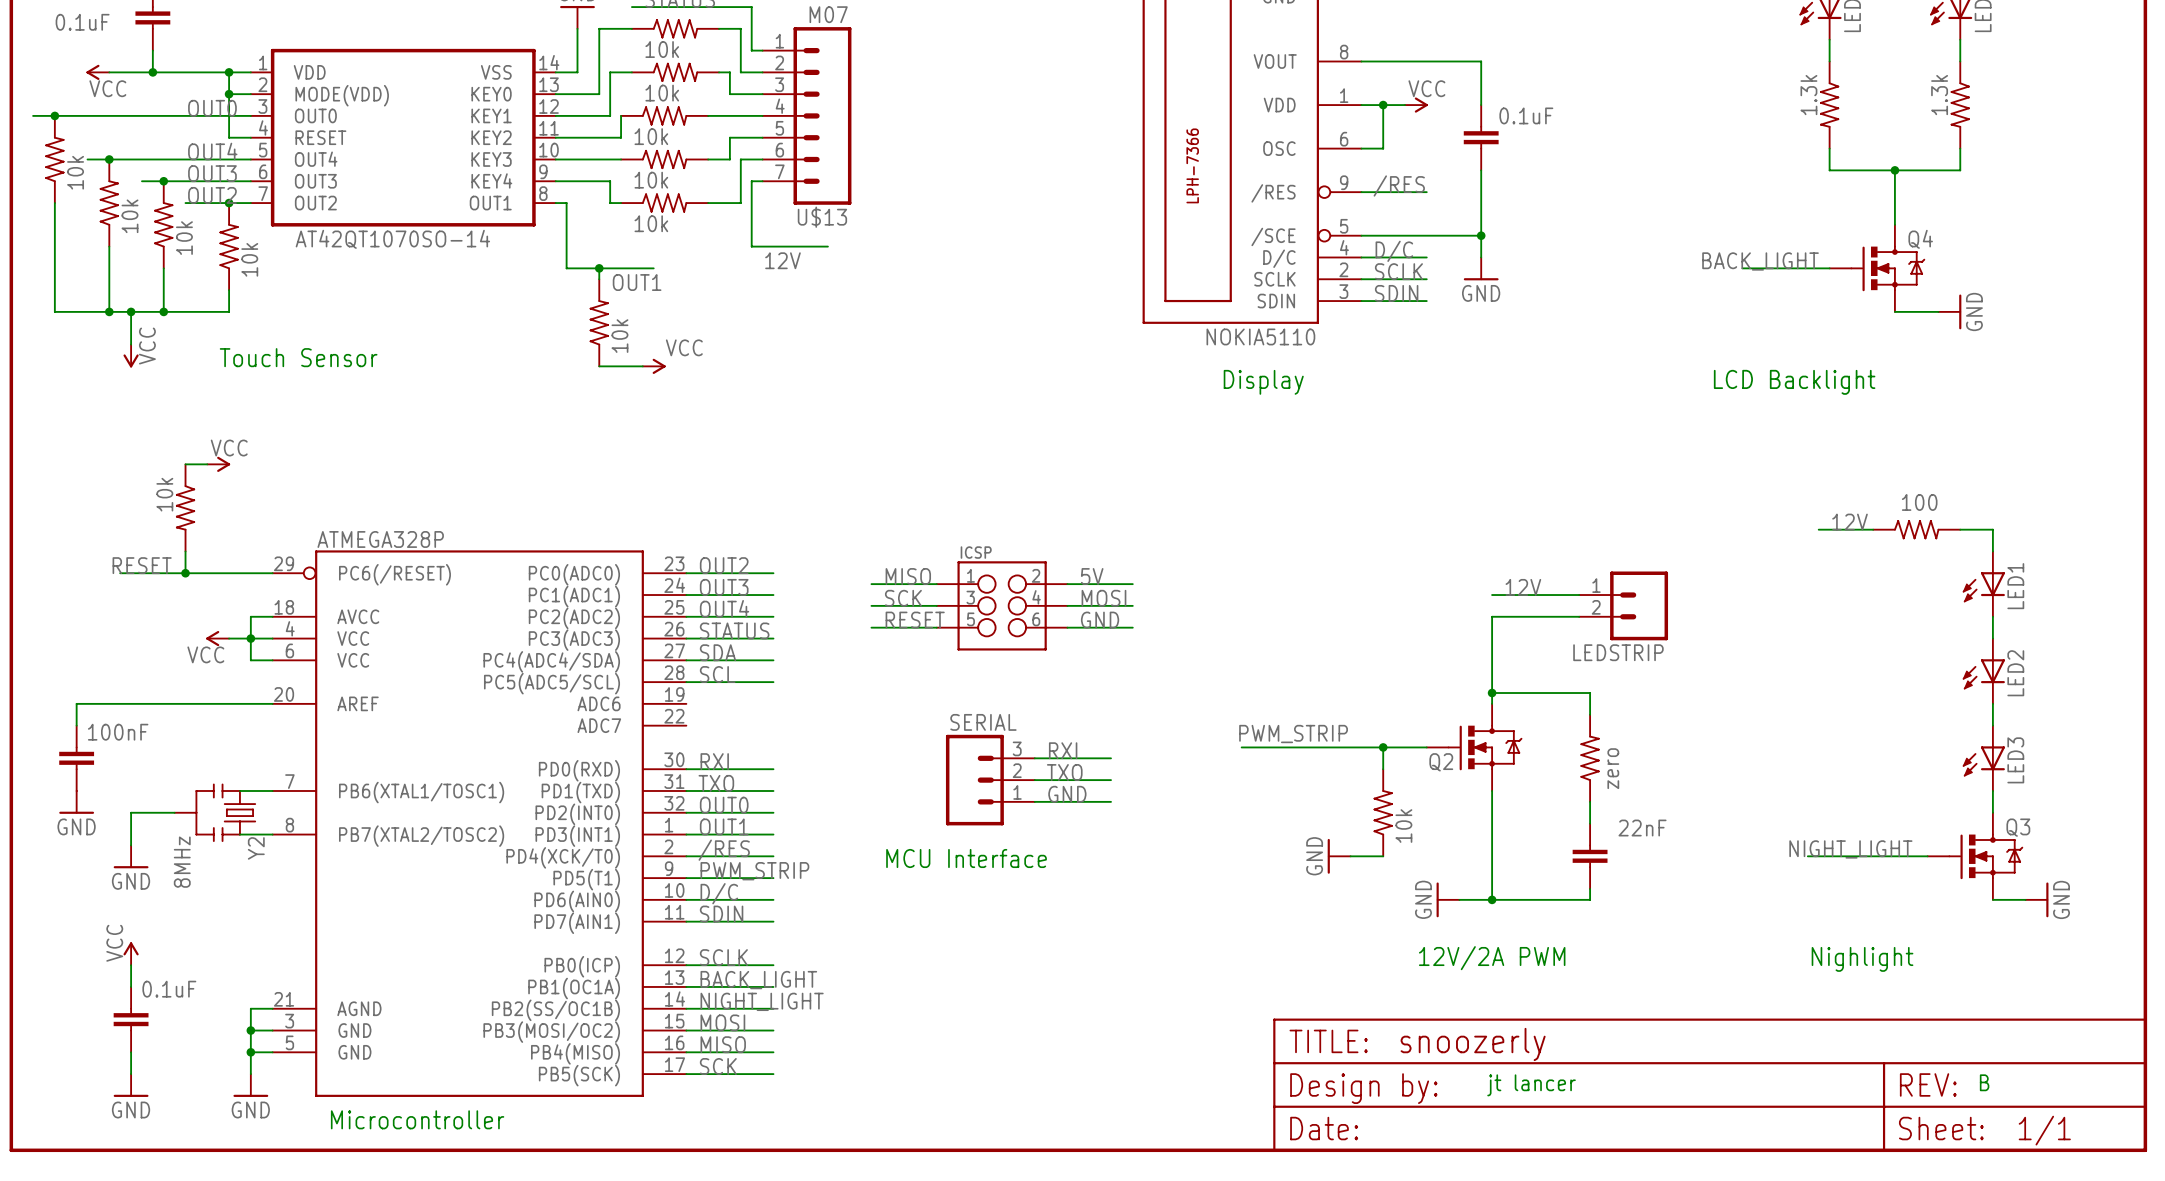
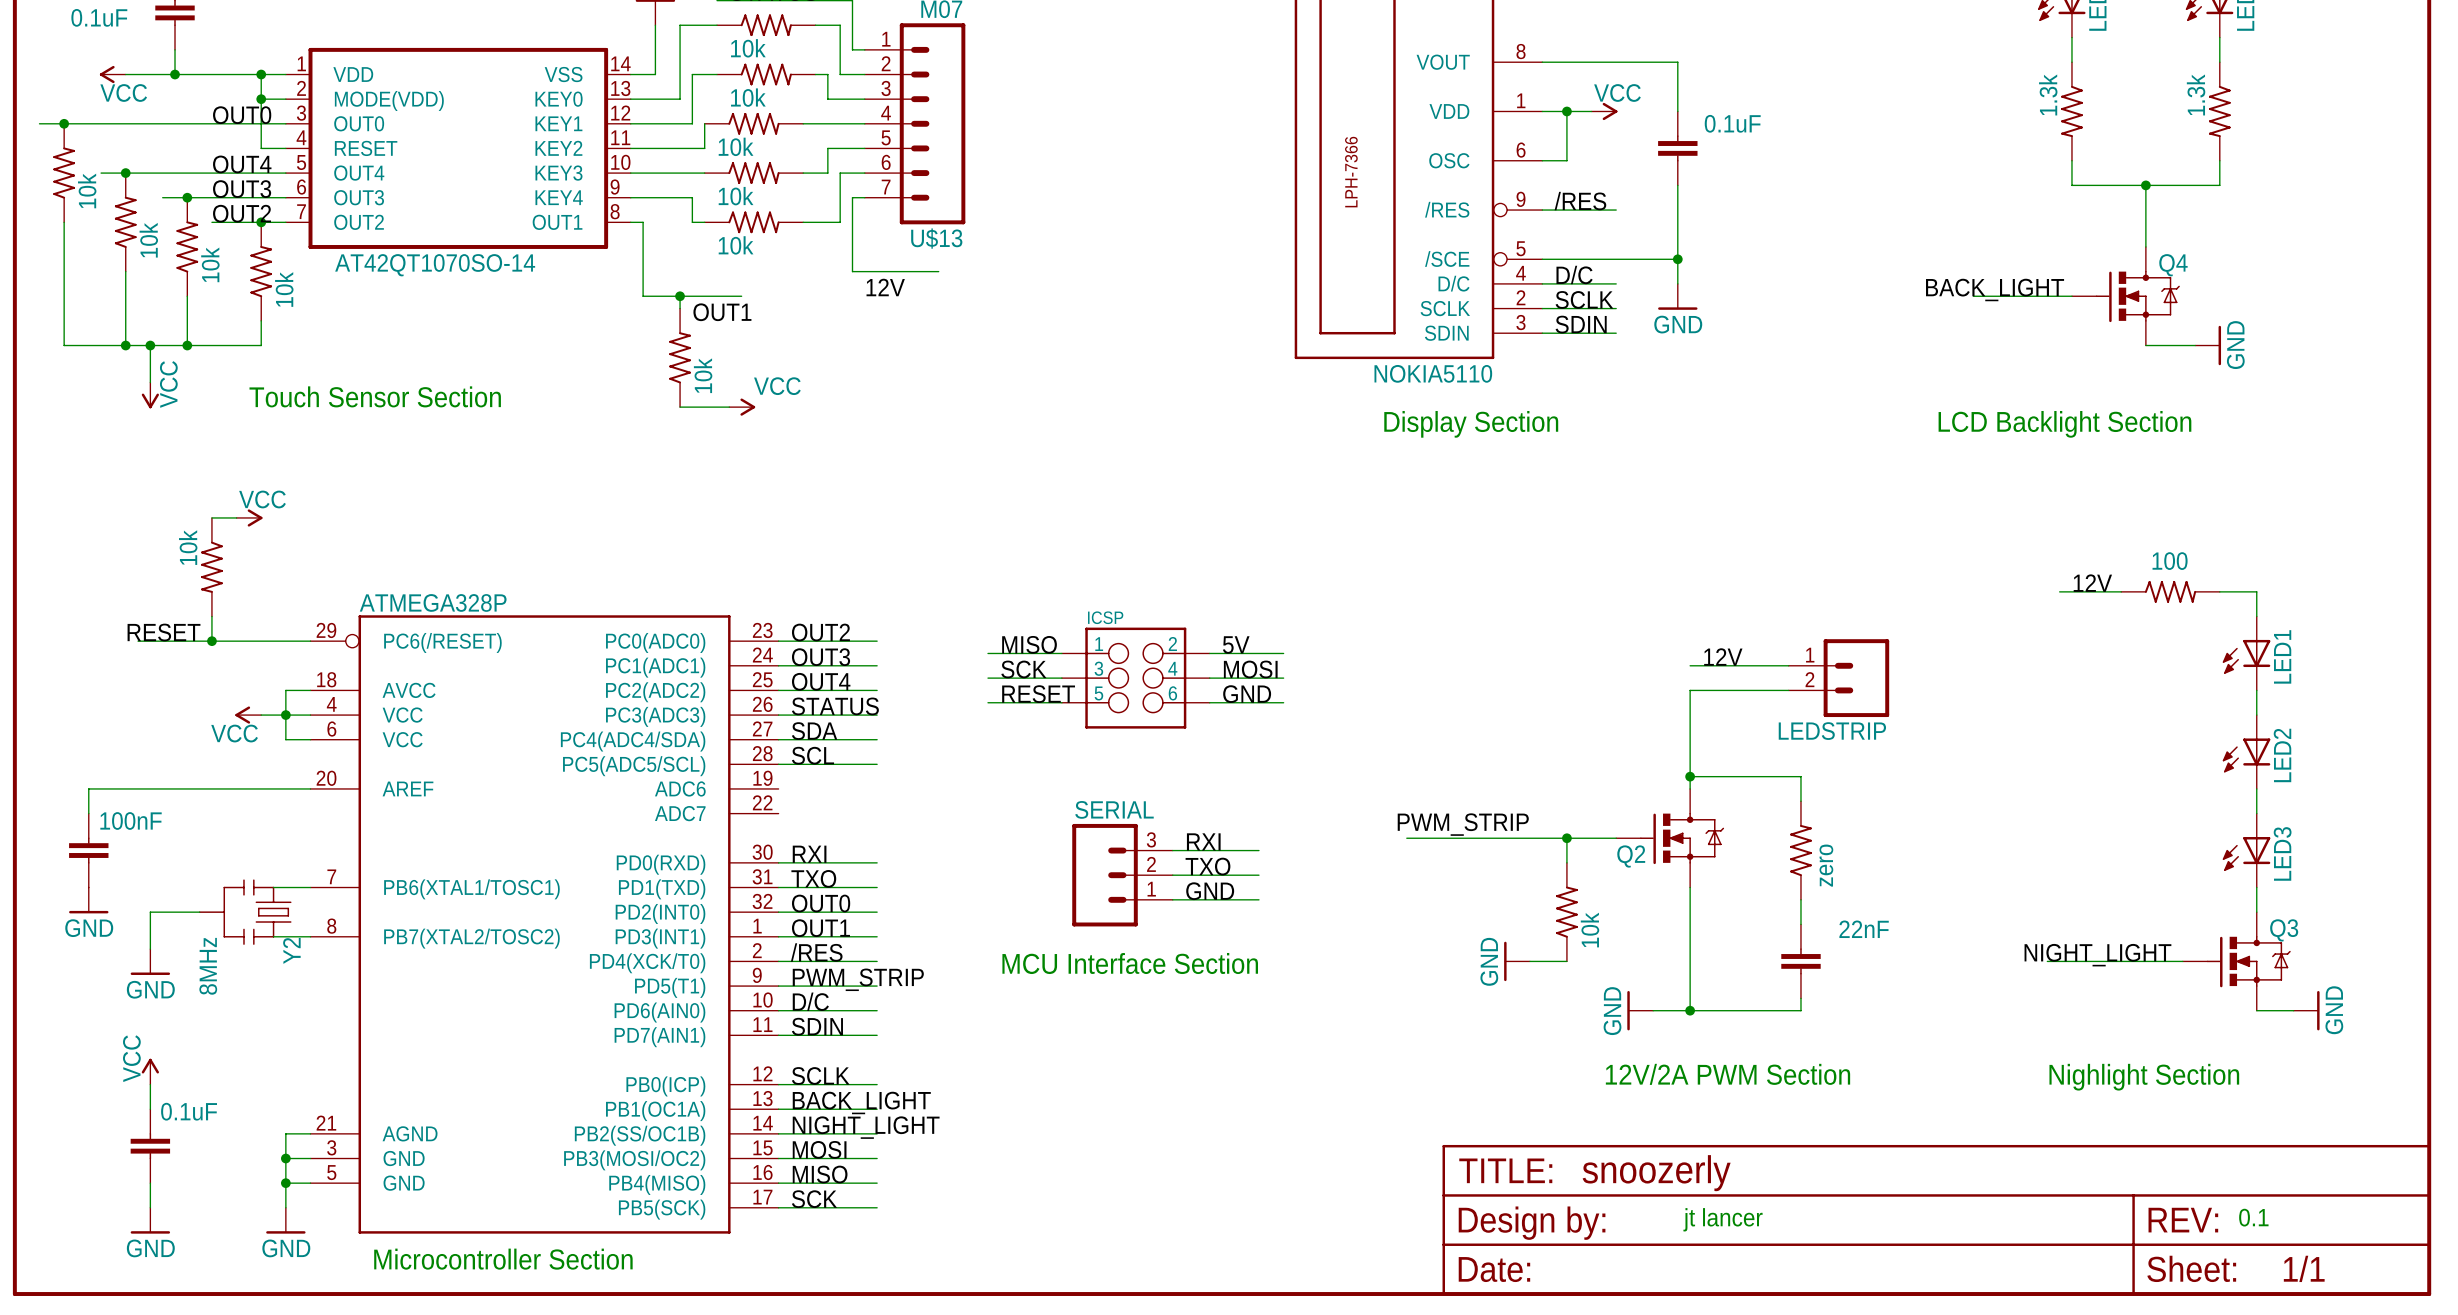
text: Touch Sensor (298, 357) -> Touch Sensor Section (375, 396)
text: Display (1263, 382) -> Display Section (1471, 424)
text: LCD Backlight (1794, 382) -> LCD Backlight Section (2064, 424)
text: MCU Interface (966, 858) -> MCU Interface Section (1130, 963)
text: 12V/2A PWM (1492, 958) -> 12V/2A PWM Section (1727, 1074)
text: Nighlight (1862, 959) -> Nighlight Section (2144, 1077)
text: B (1984, 1082) -> 0.1 (2253, 1217)
text: Microcontroller (417, 1119) -> Microcontroller Section (503, 1259)

